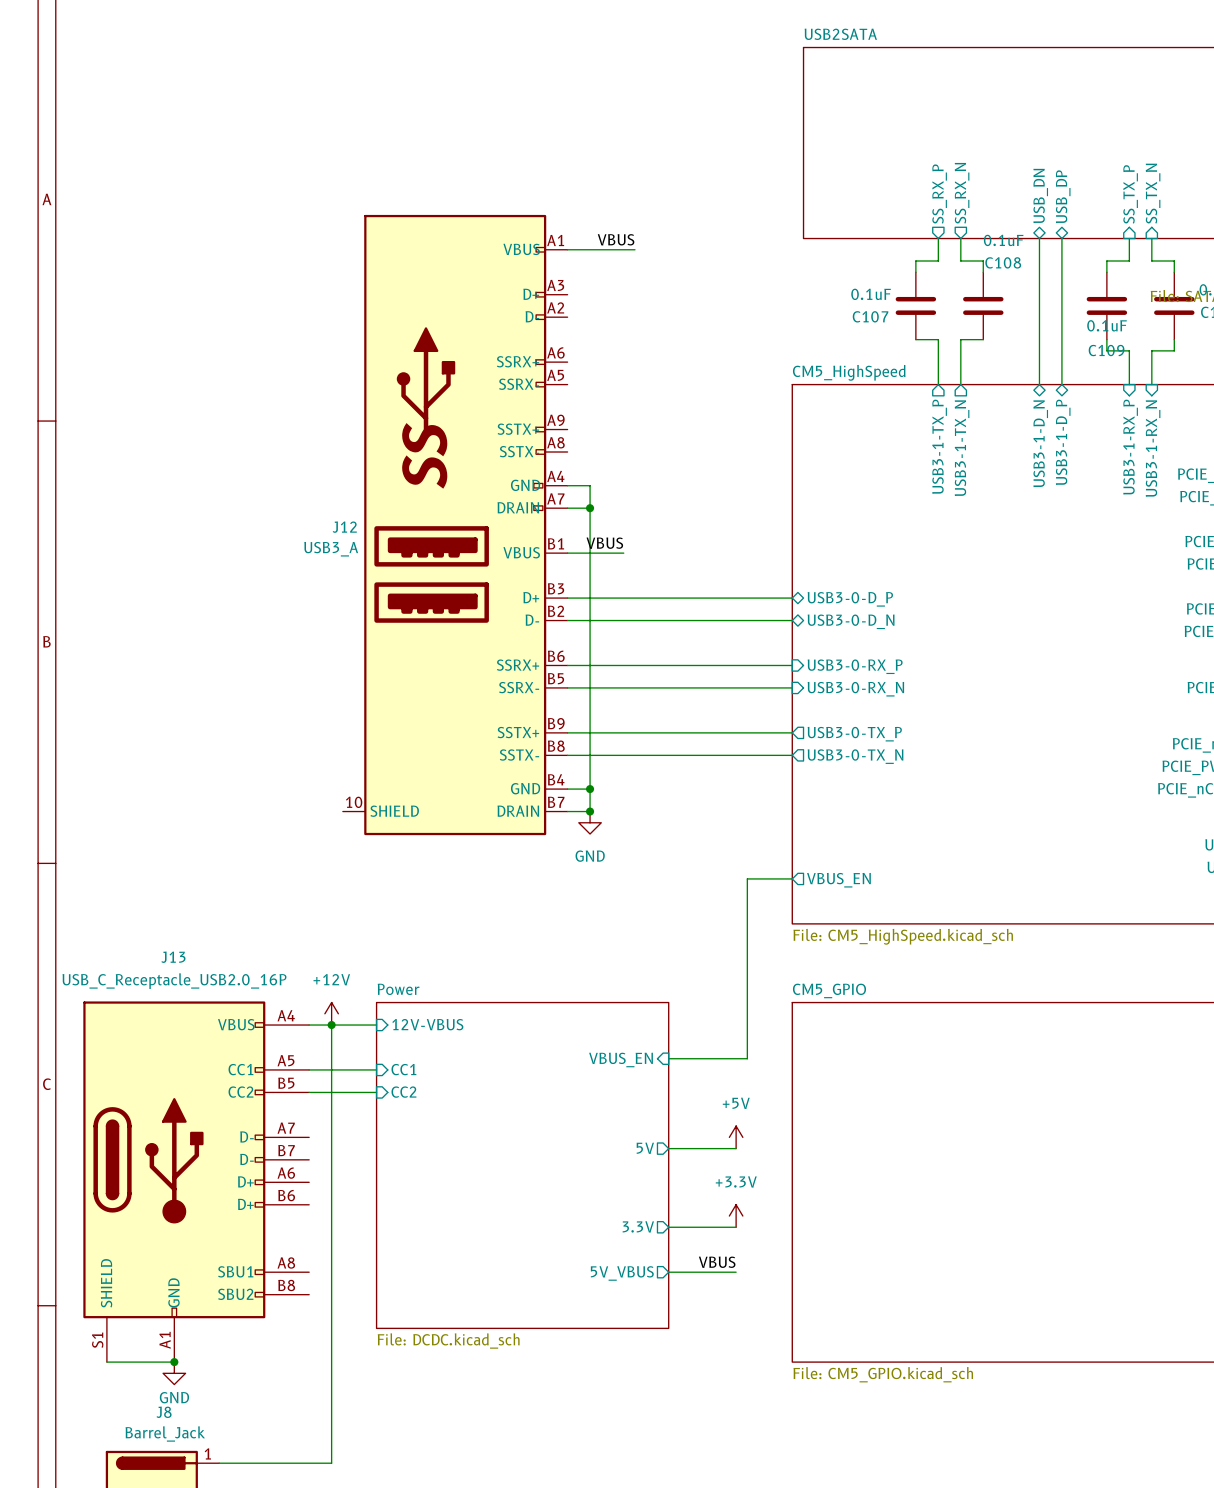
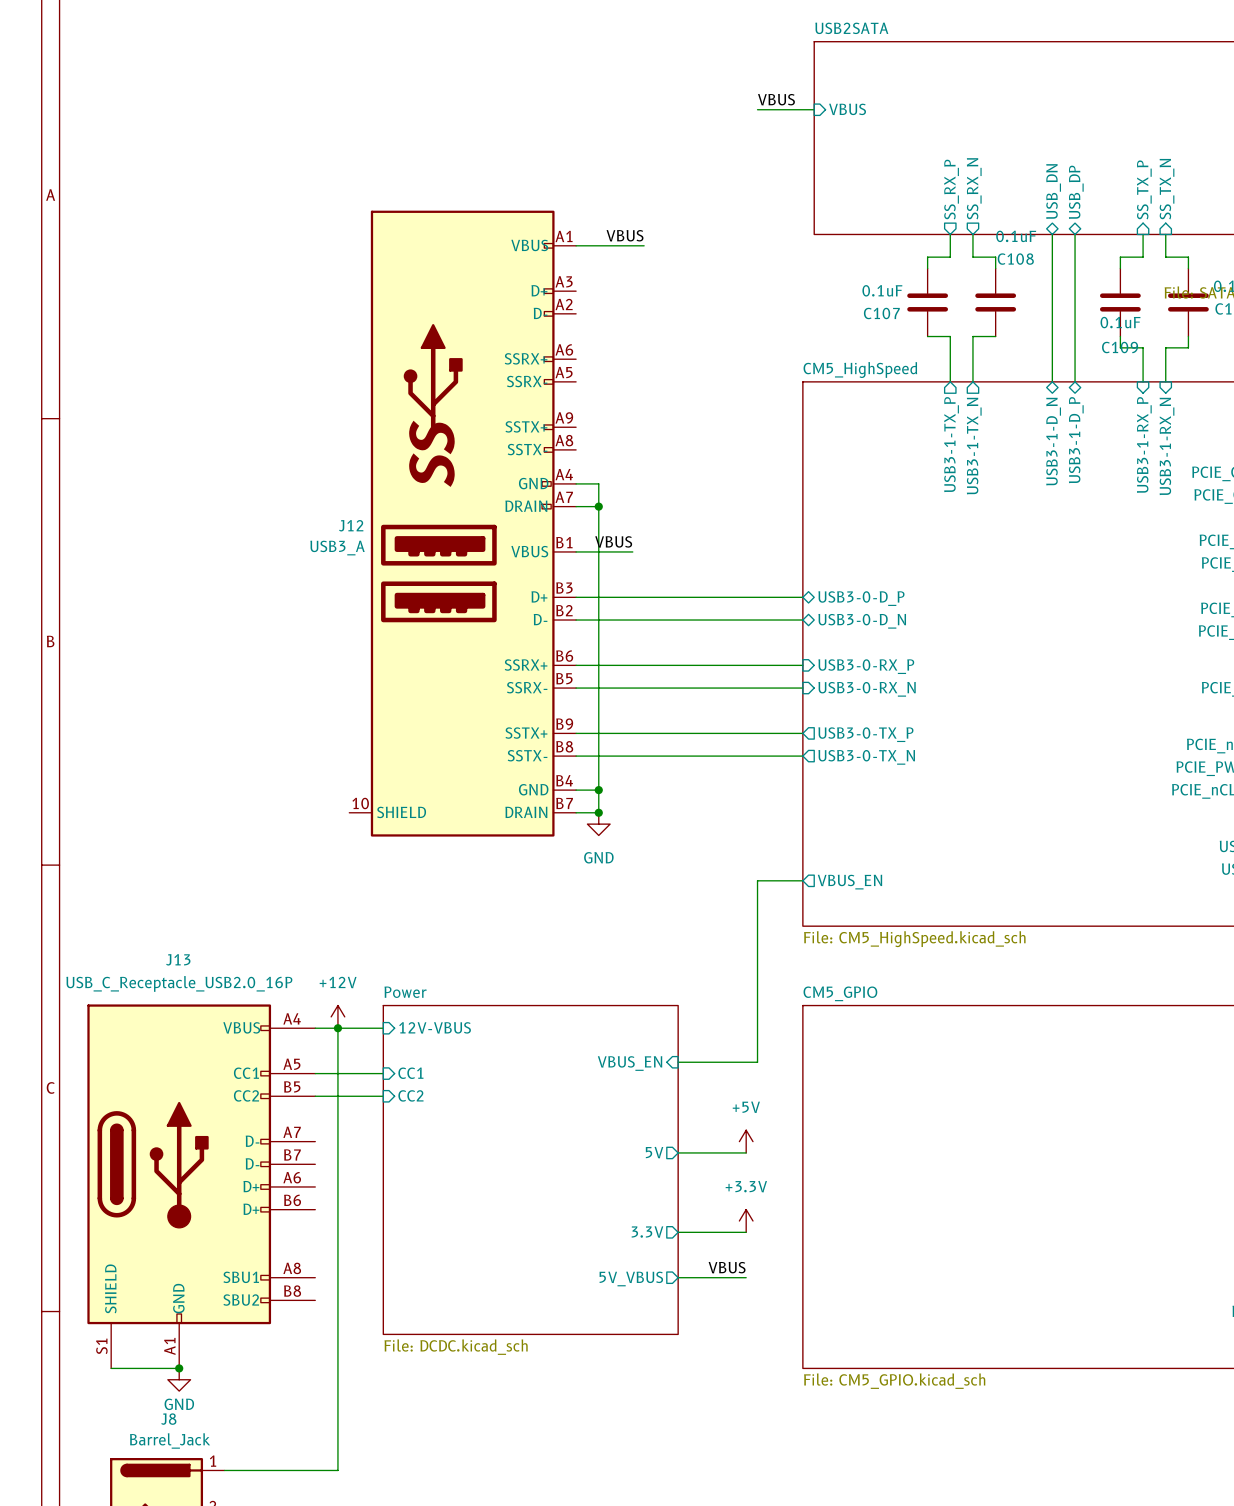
label: none -> VBUS (776, 99)
wire: none -> (757, 109) (814, 109)
sheet pin: none -> VBUS (847, 109)

